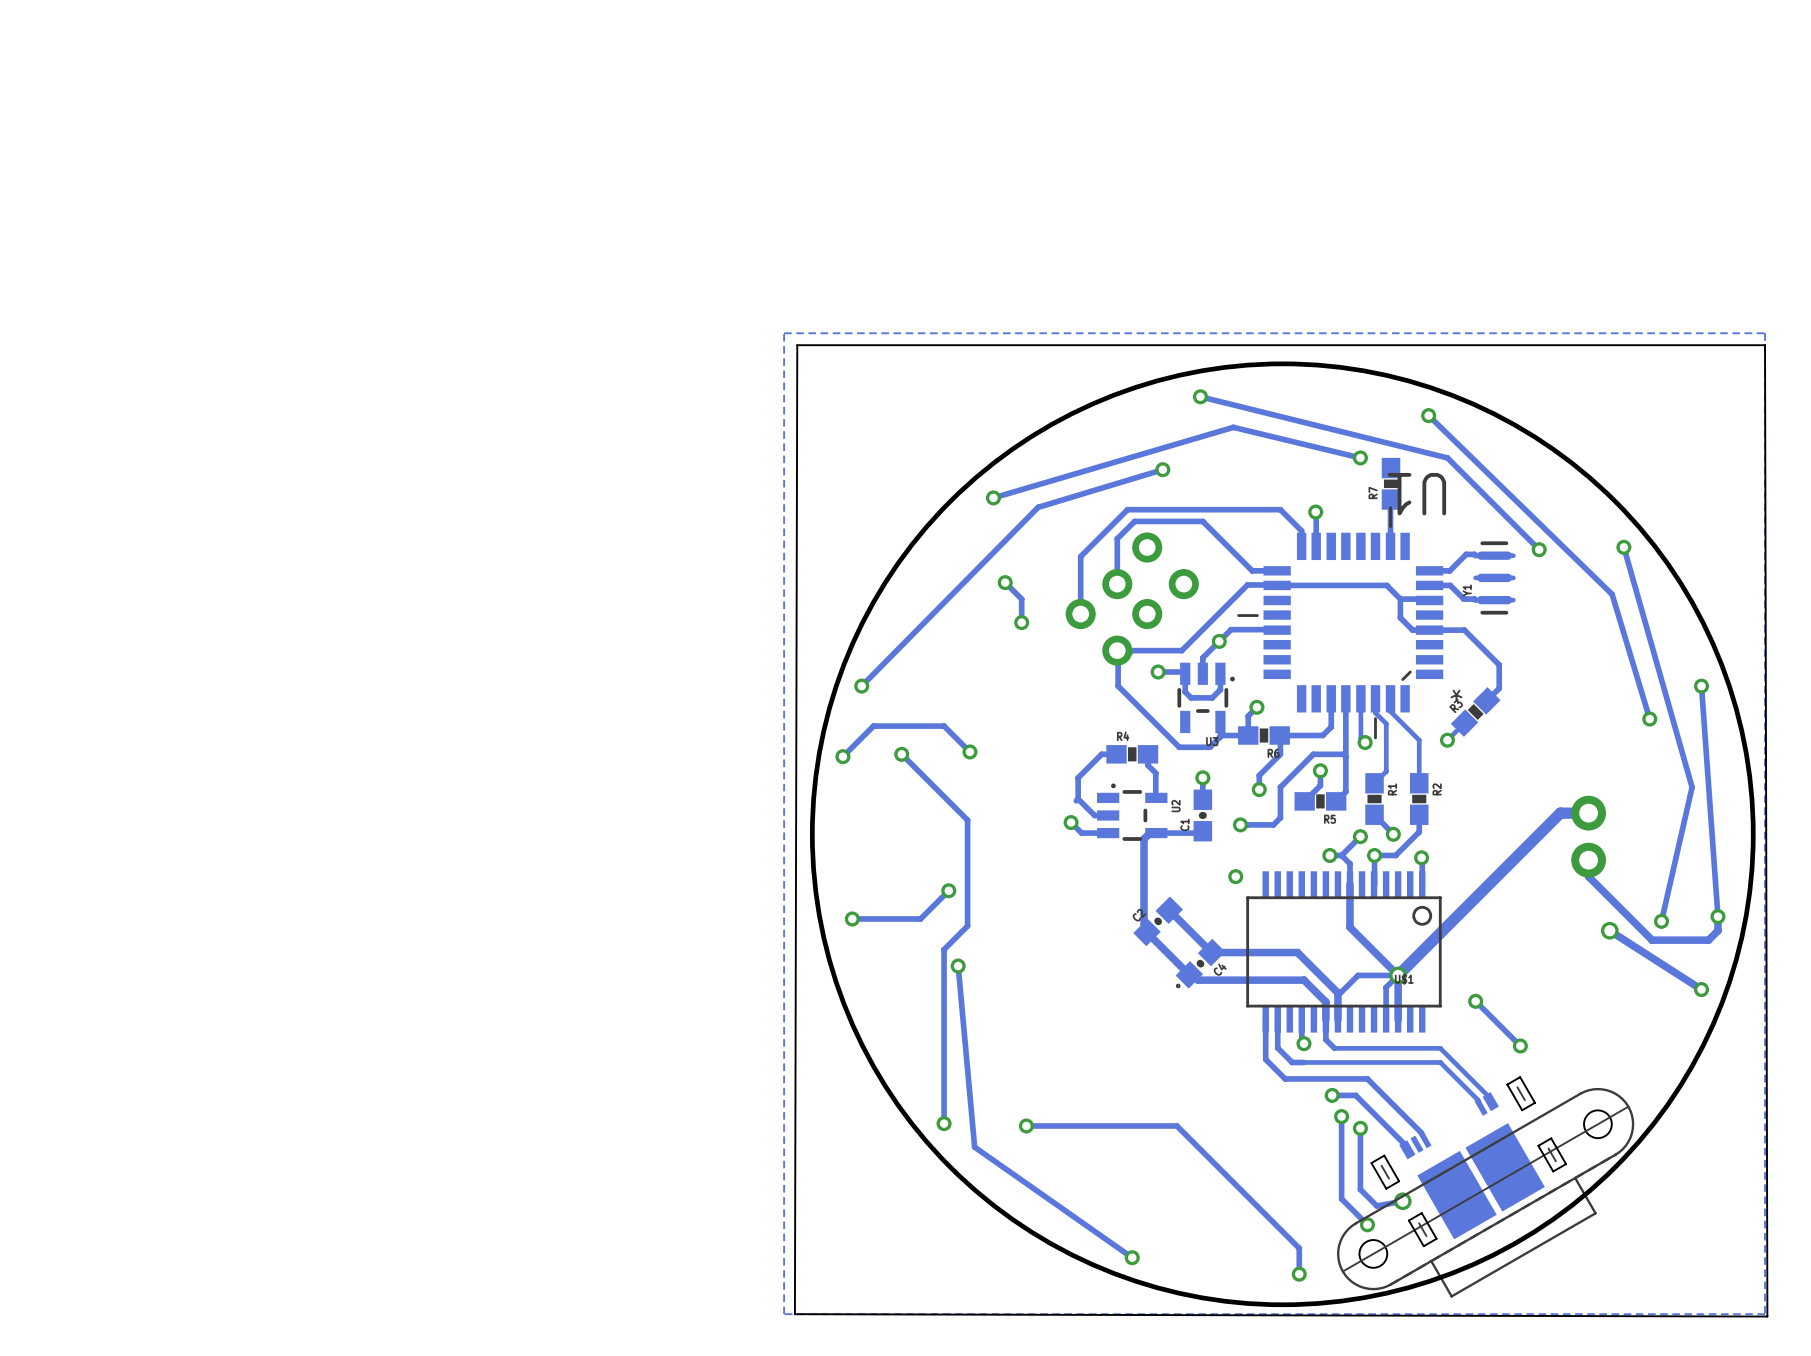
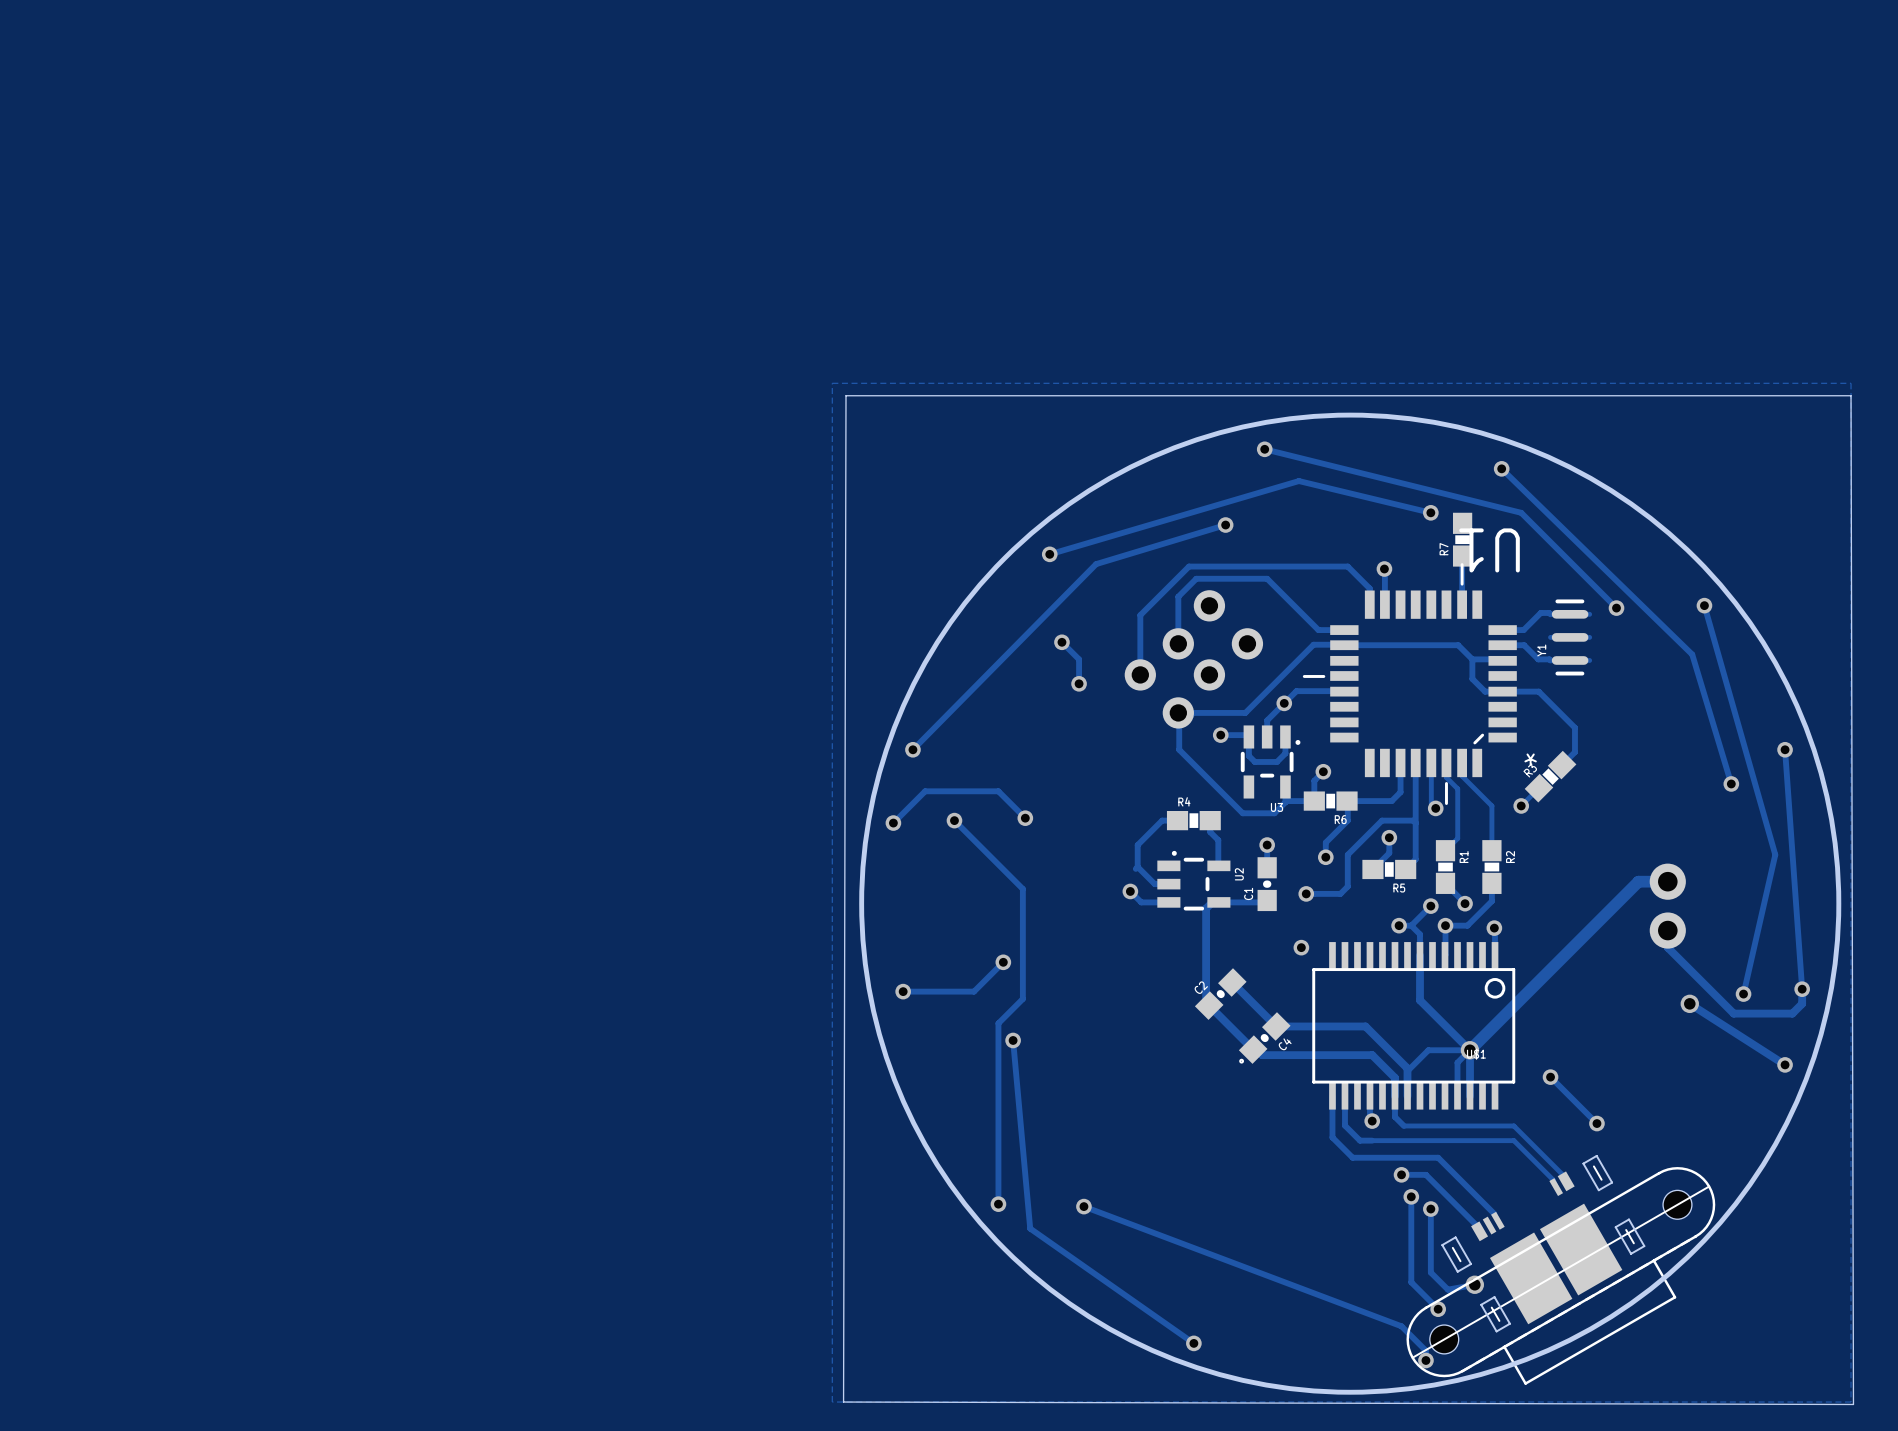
track: (1026, 1125) (1176, 1125) (1299, 1248) (1299, 1274) -> (1083, 1206) (1401, 1326) (1425, 1350) (1425, 1360)
via position: (1299, 1274) -> (1425, 1360)

